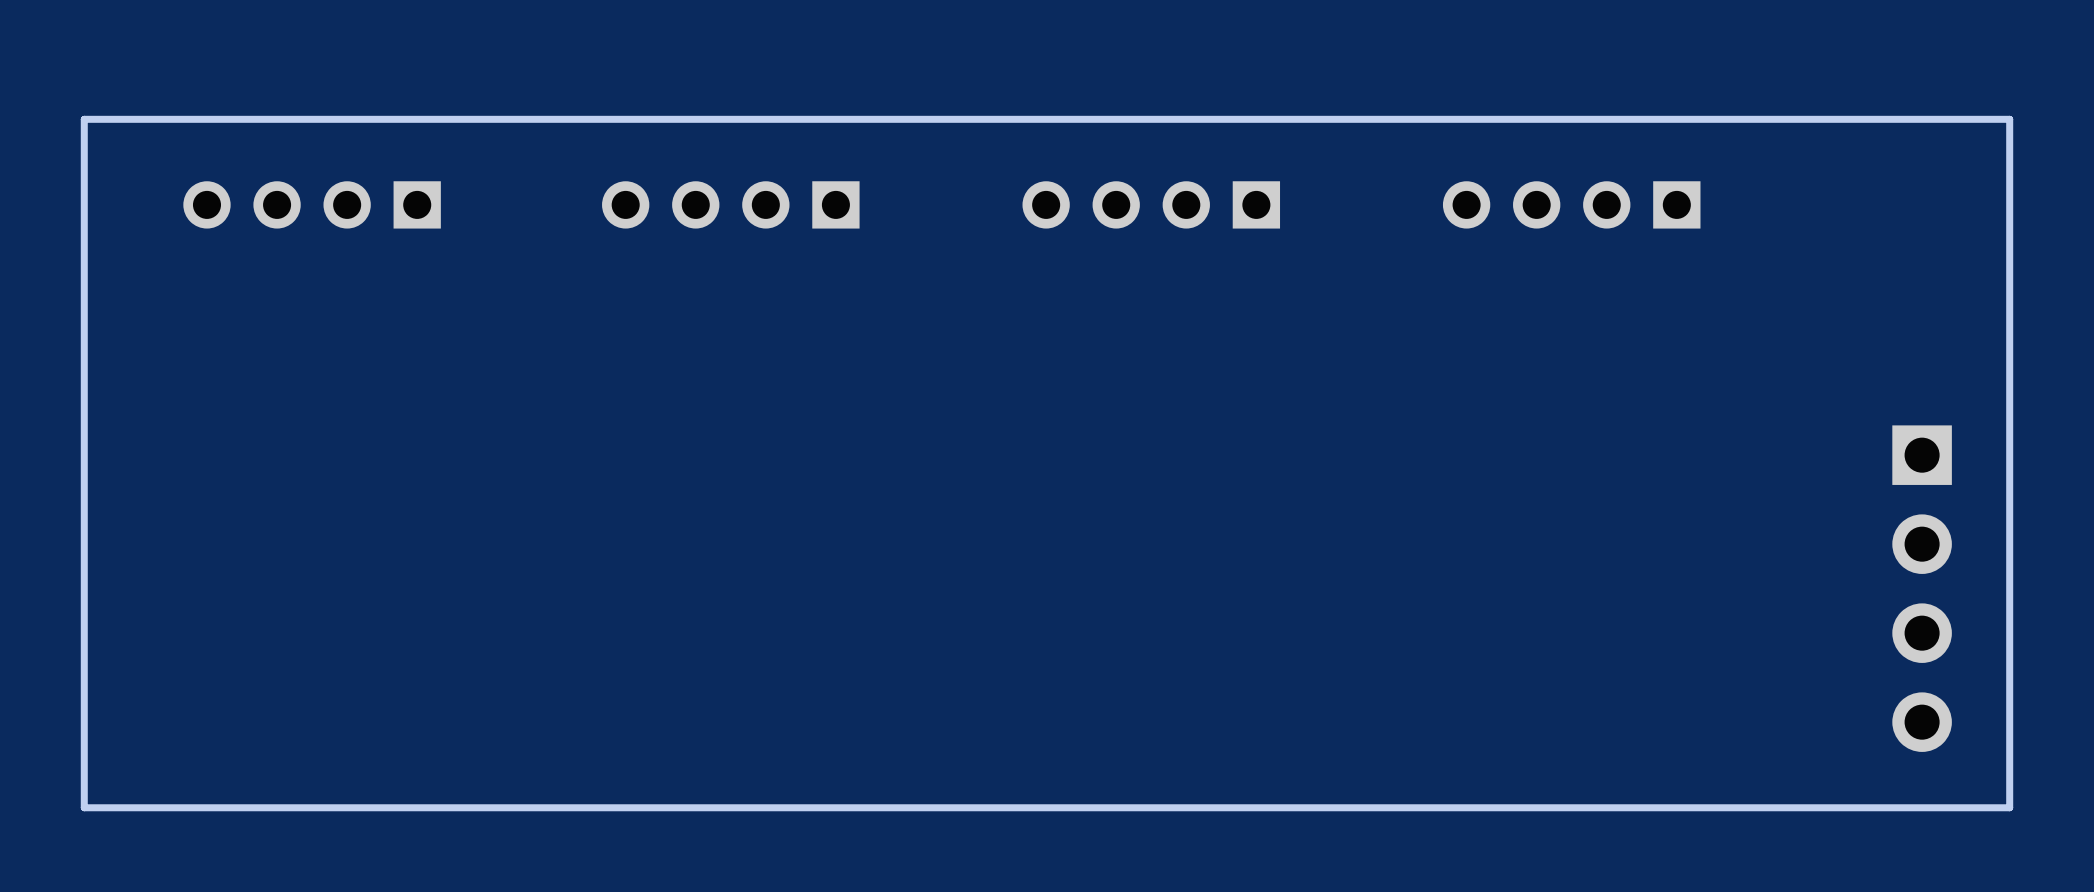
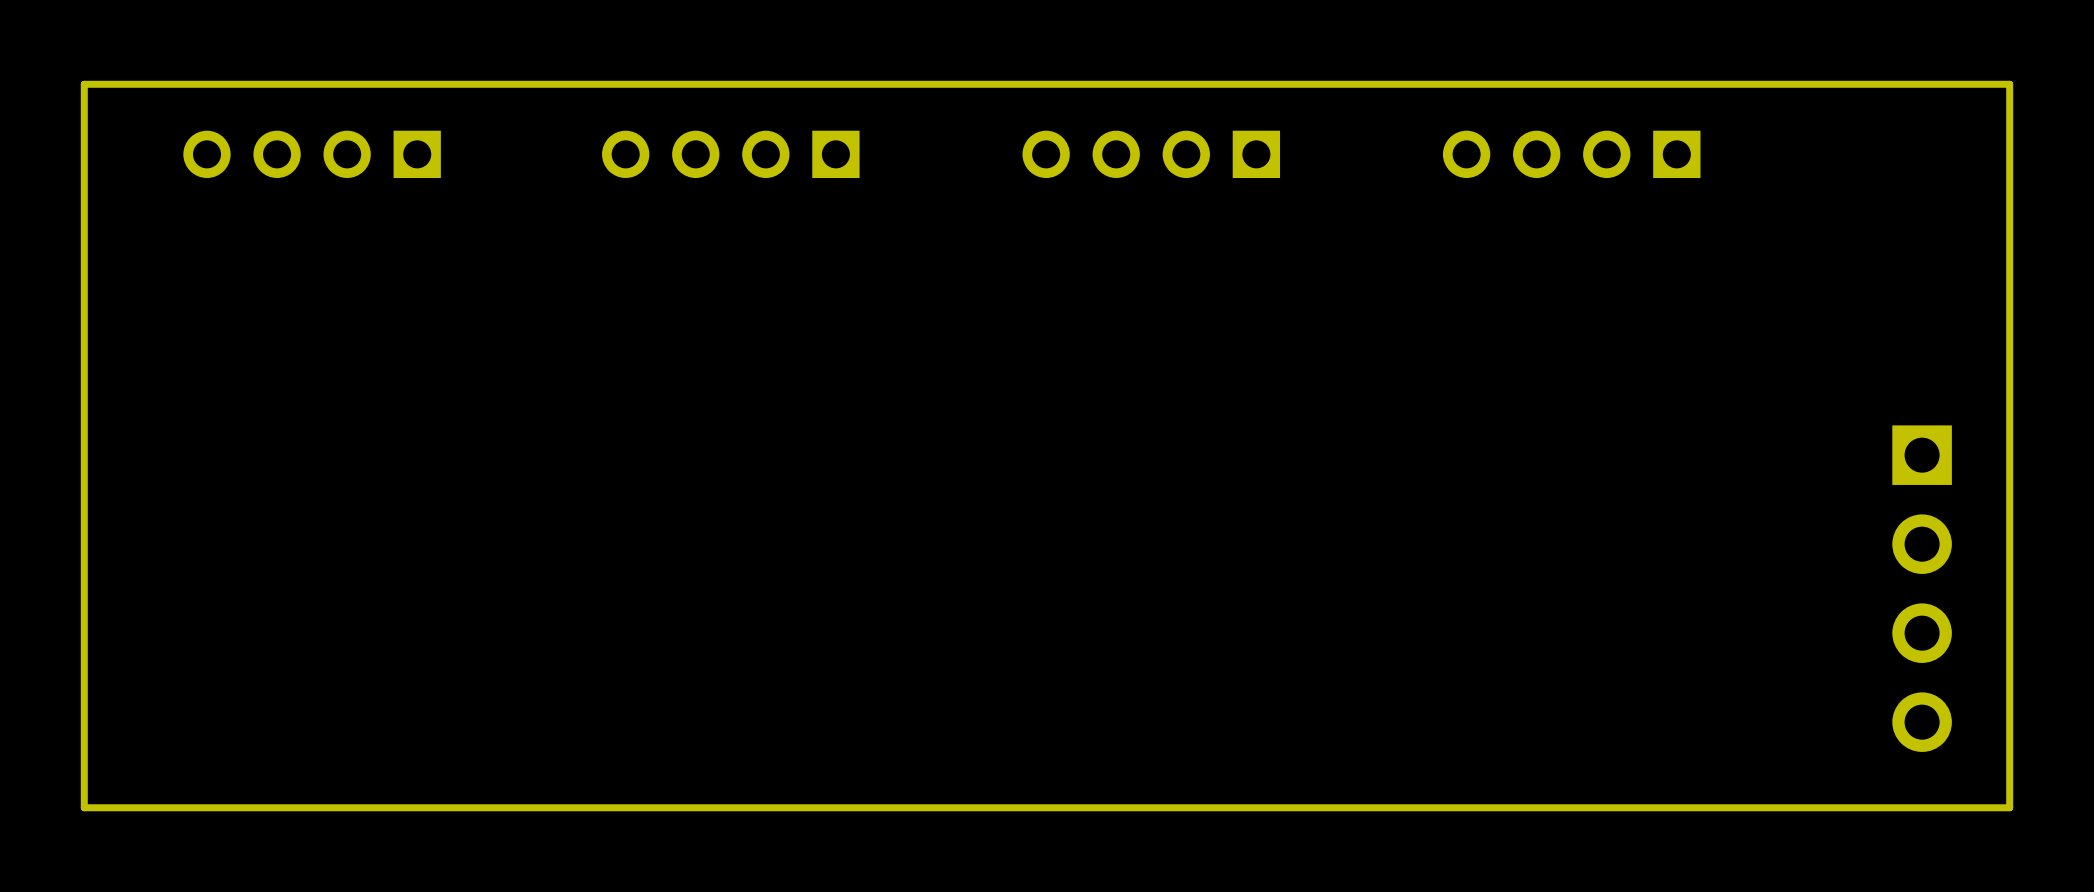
board edge: (2009, 119) (84, 119) -> (2009, 119) (2009, 84) (84, 84) (84, 119)
part position: (312, 204) -> (312, 154)
part position: (730, 204) -> (730, 154)
part position: (1151, 204) -> (1151, 154)
part position: (1571, 204) -> (1571, 154)

